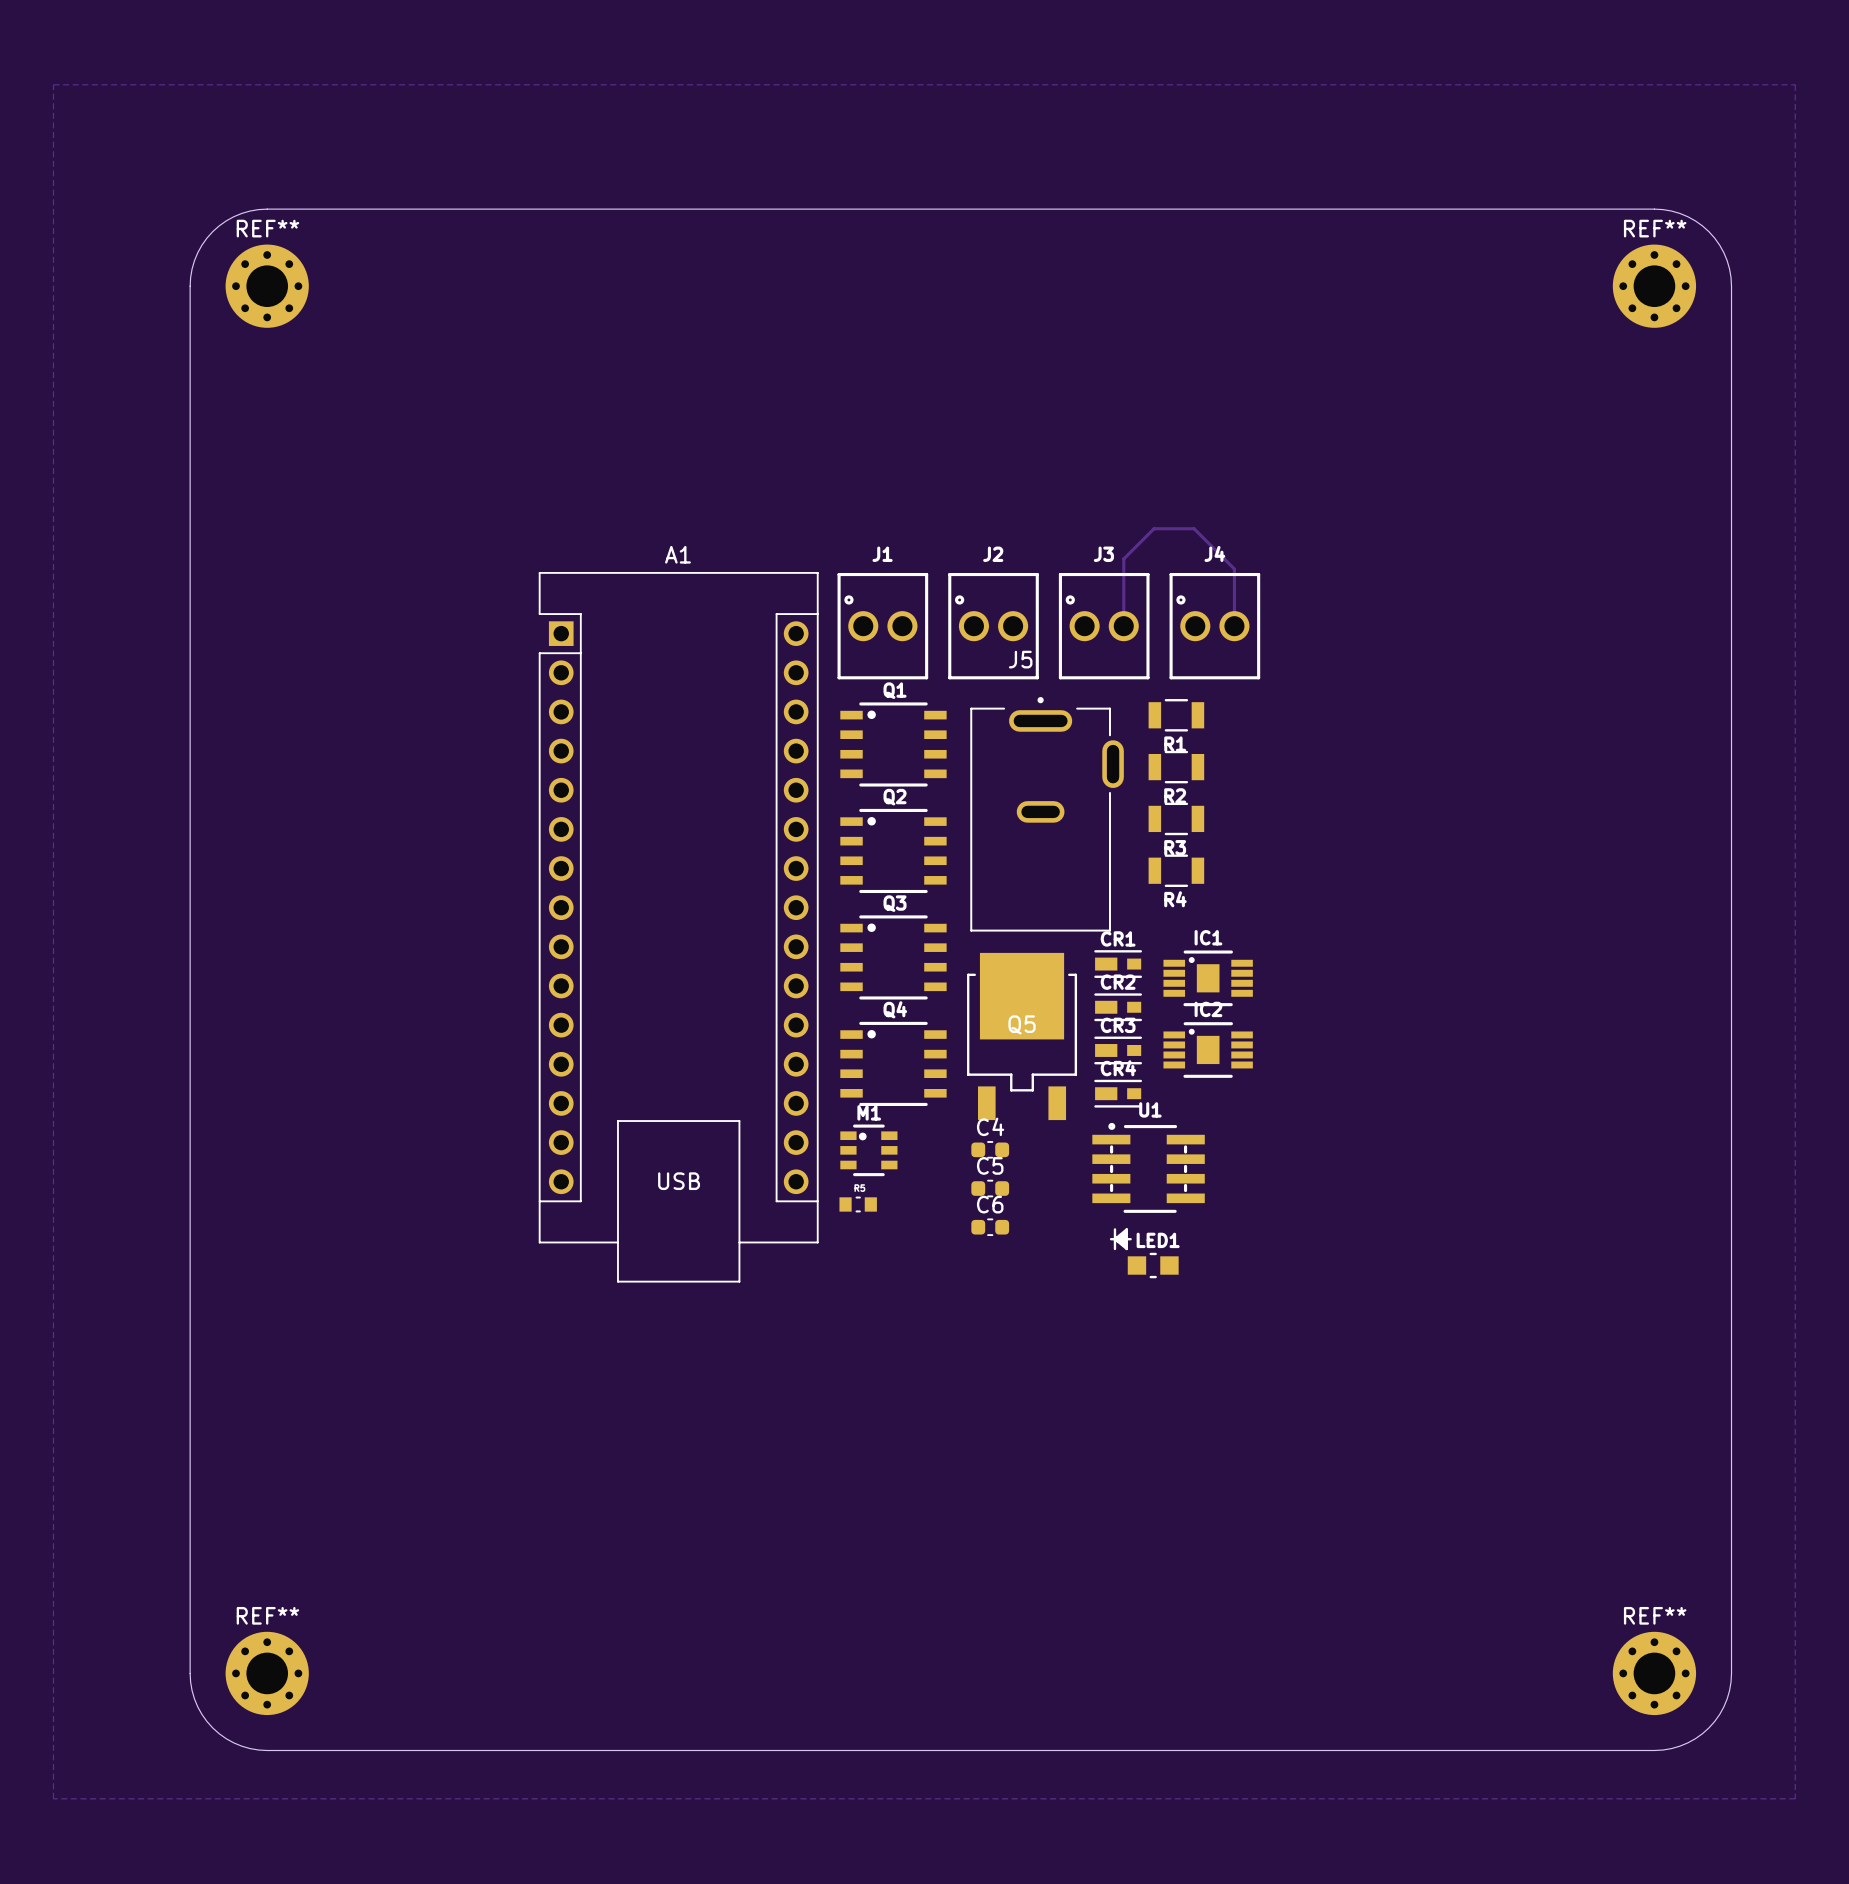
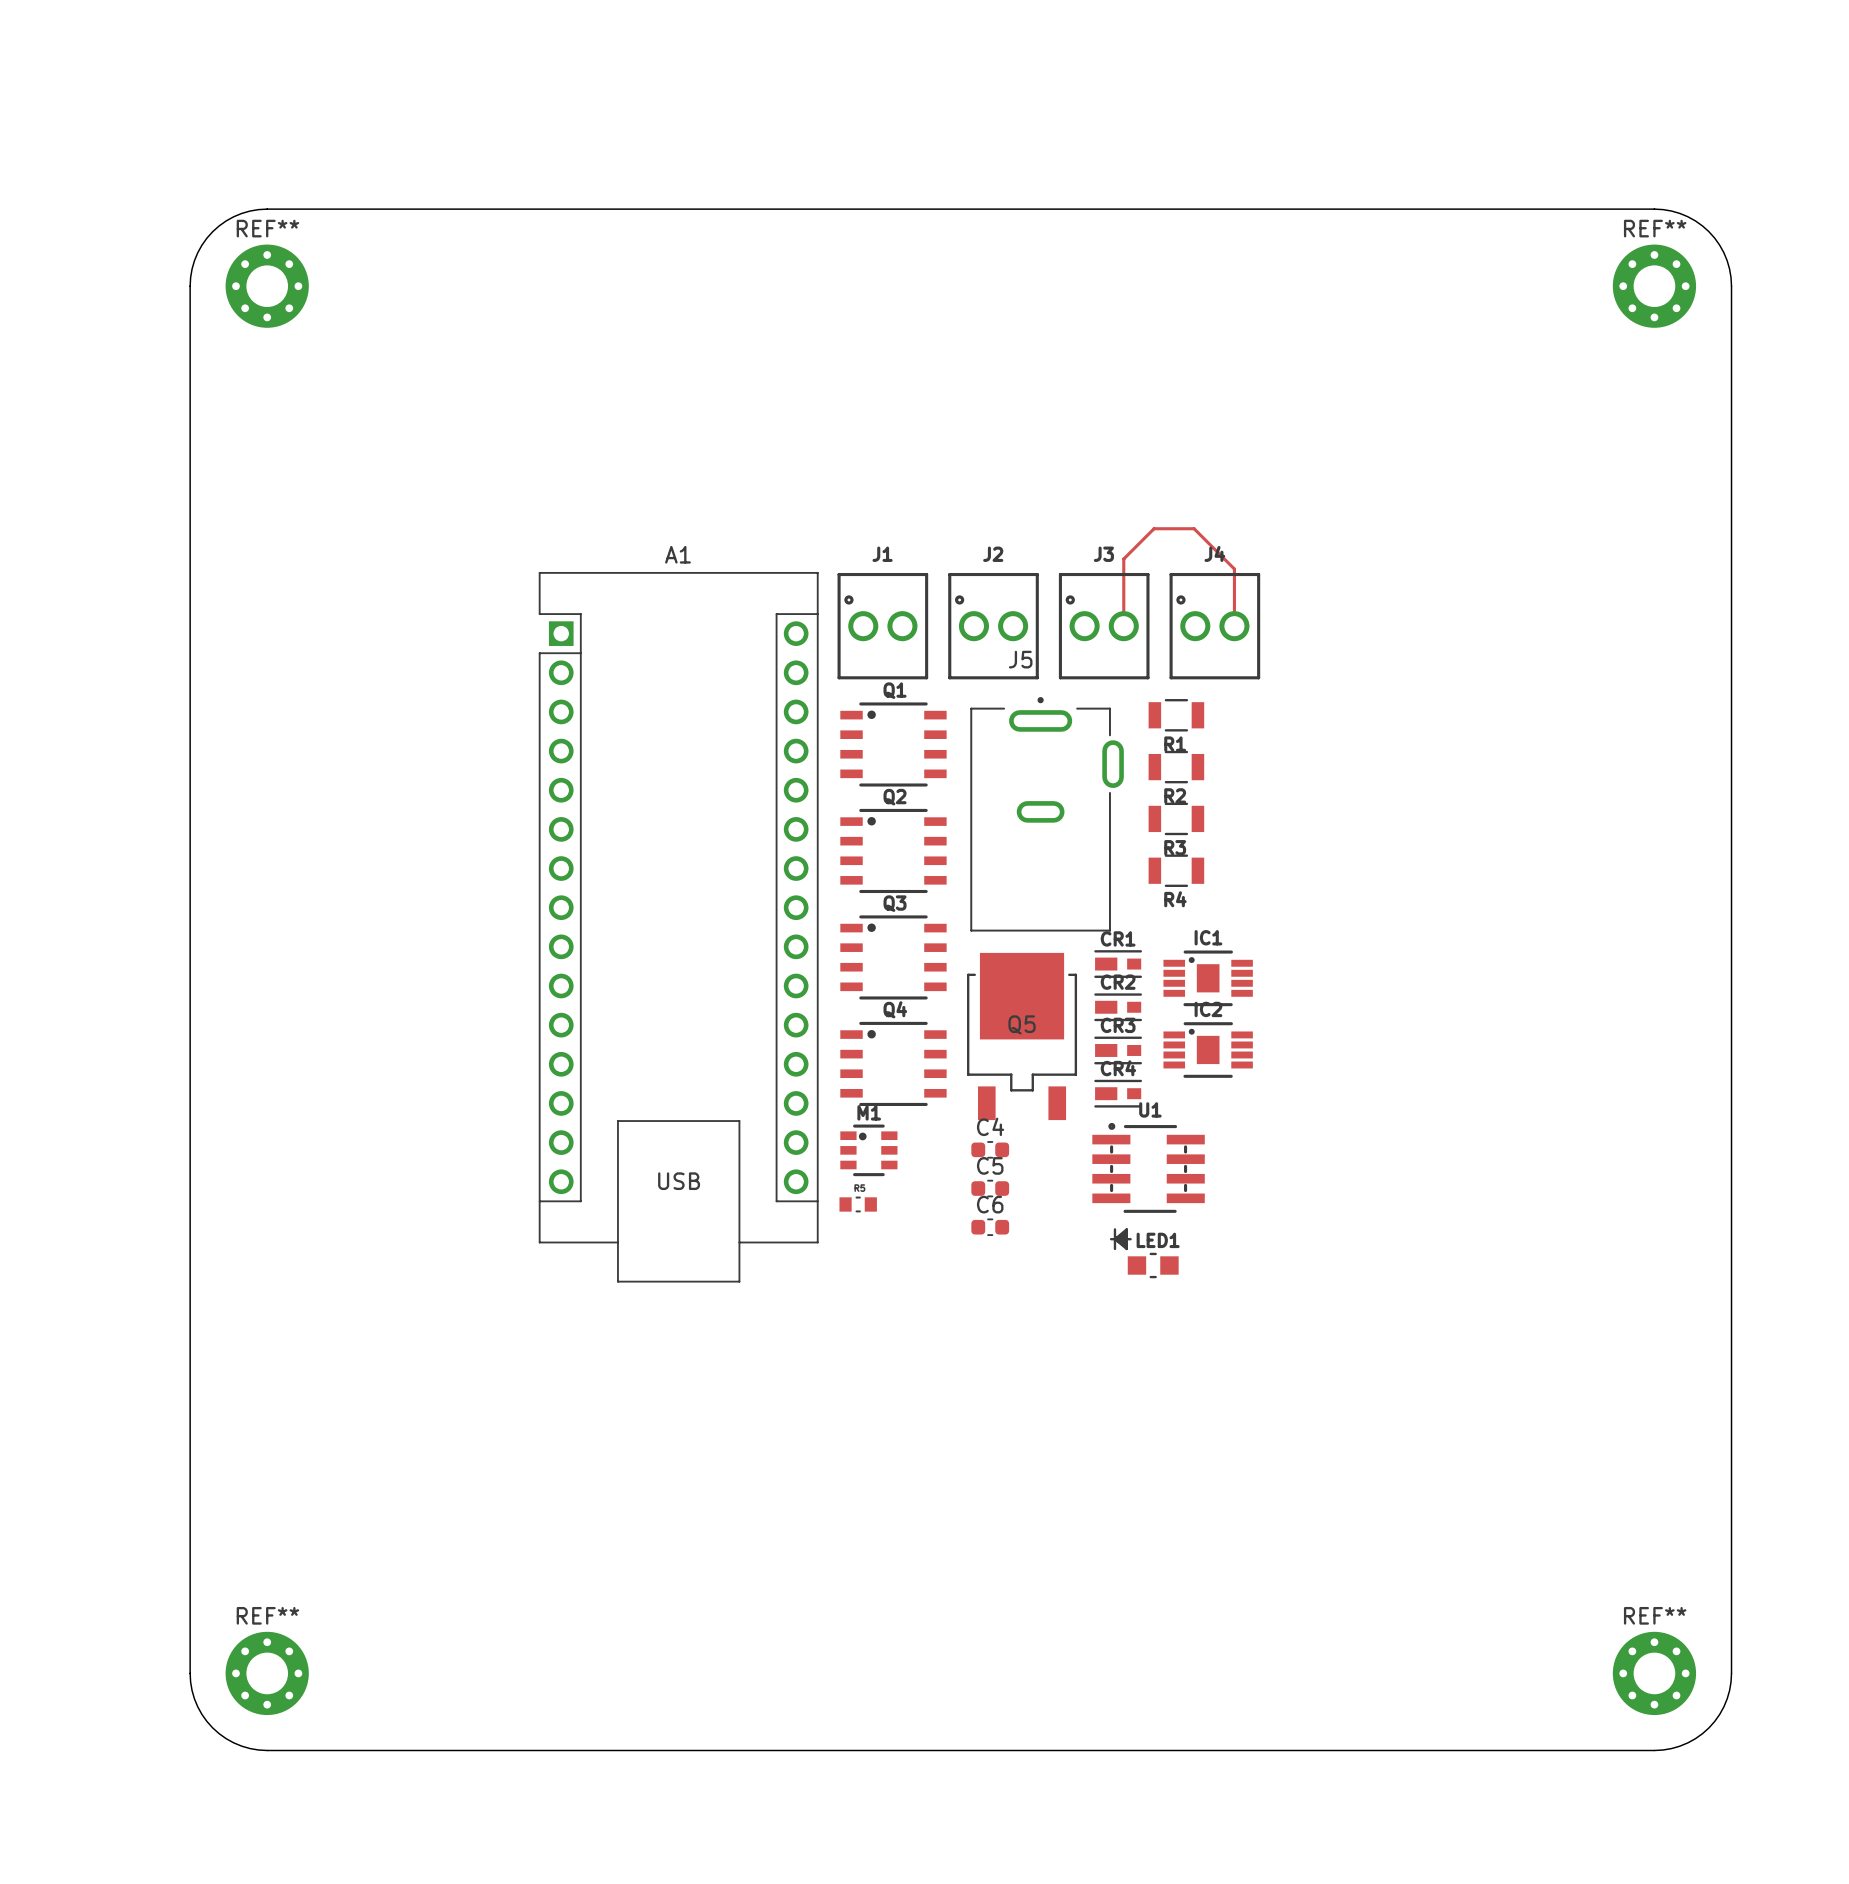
zone outline: (53, 84) (1795, 84) (1795, 1798) (53, 1798) (53, 84) -> none

